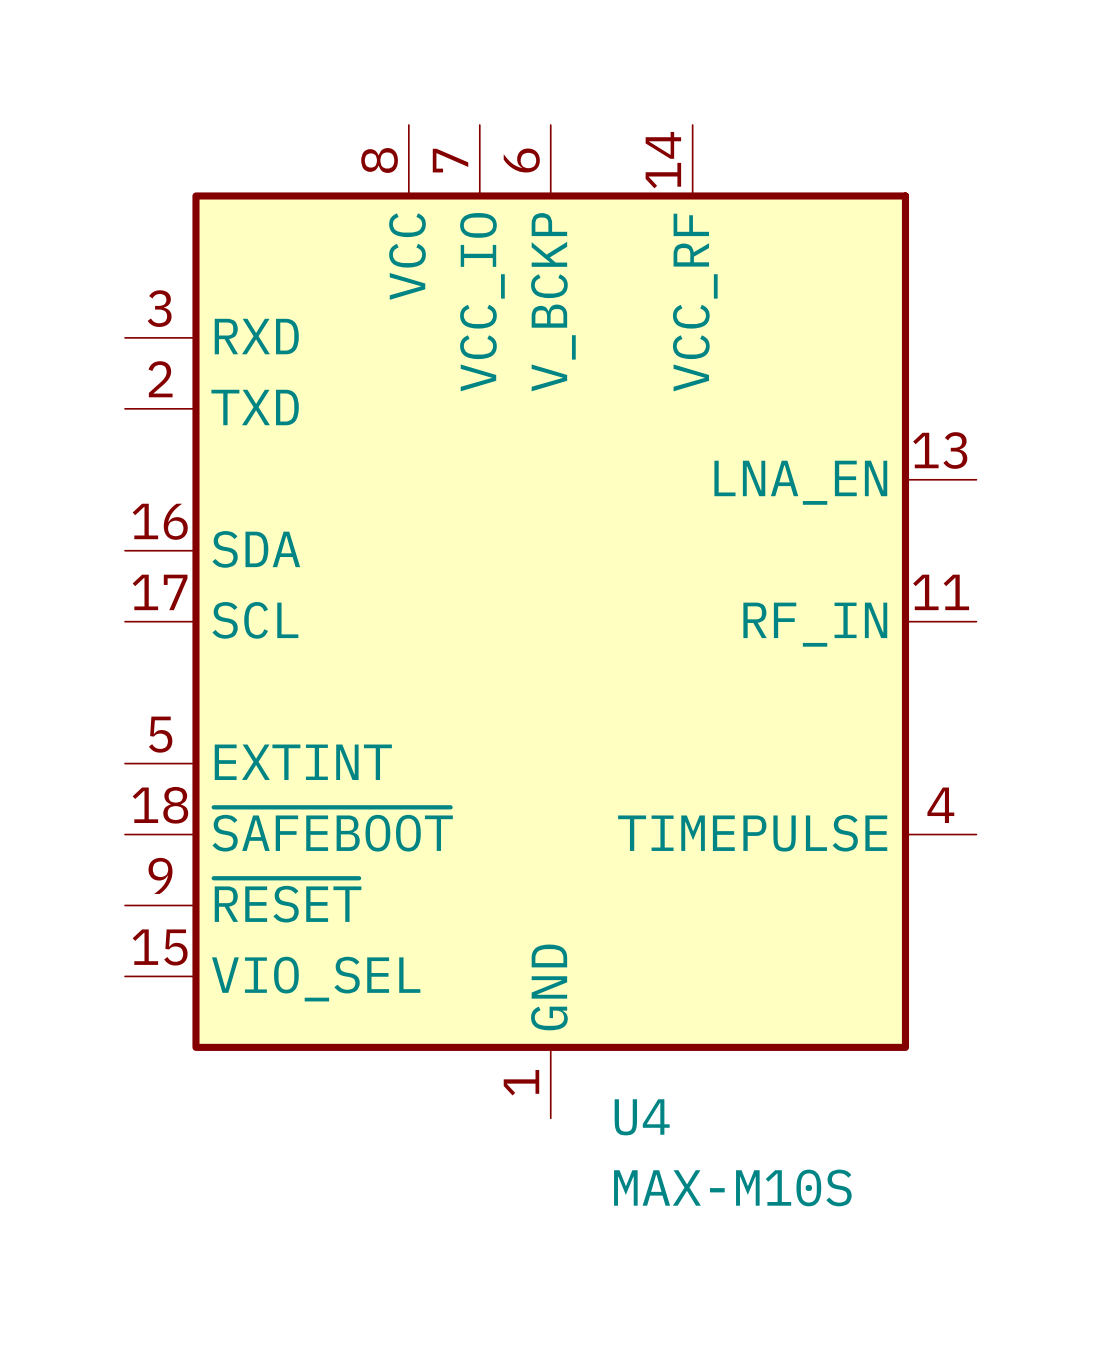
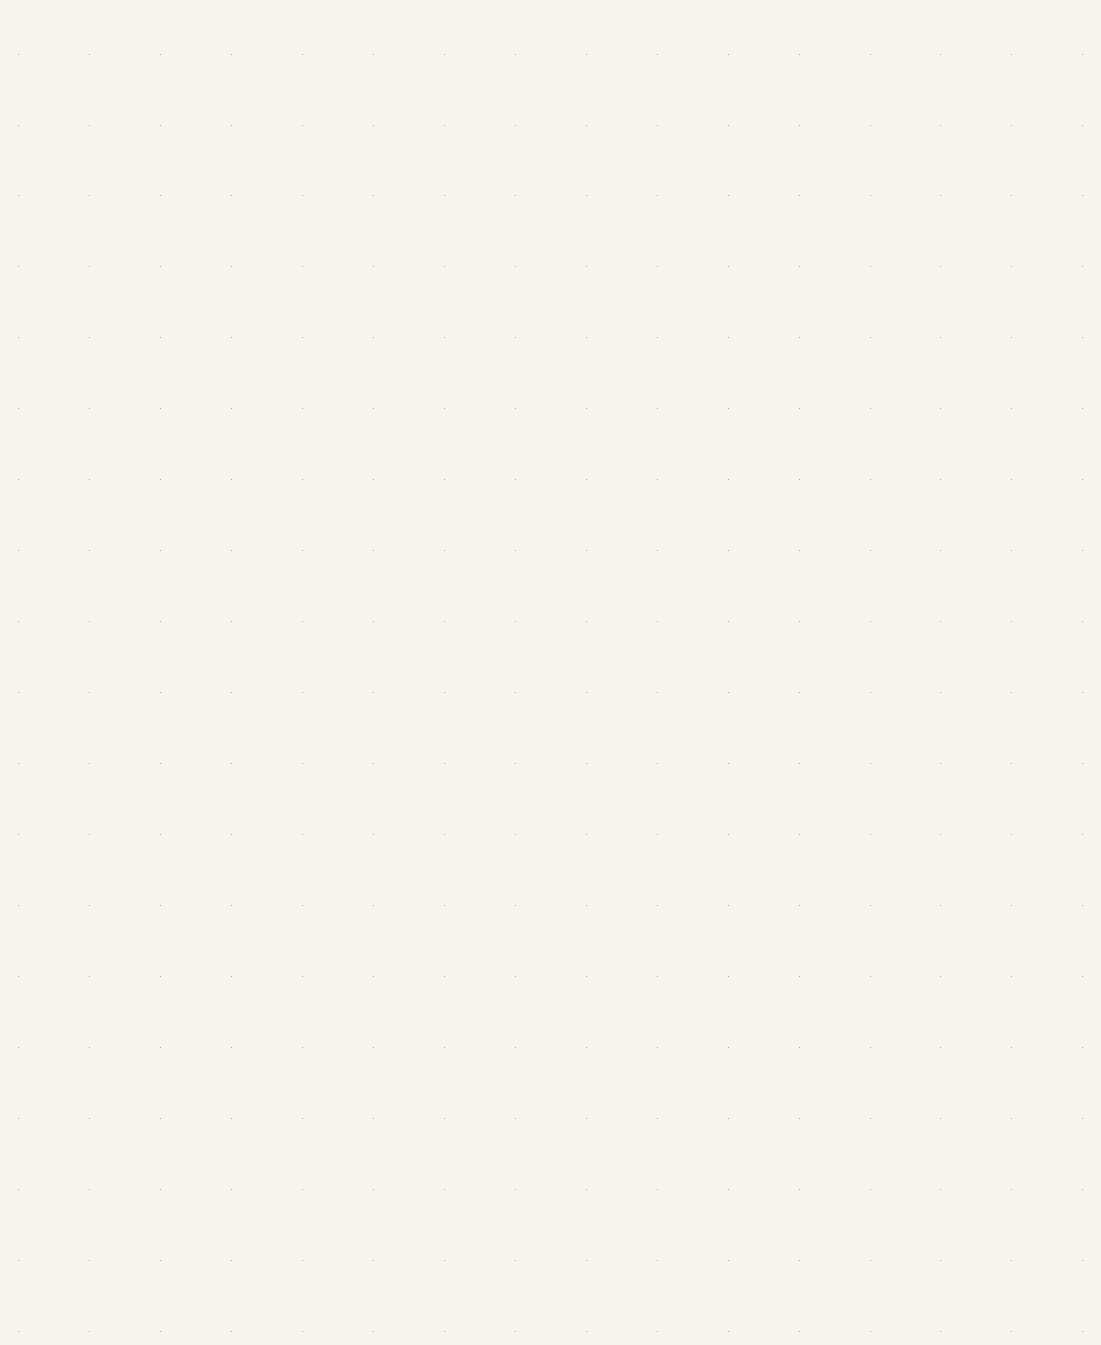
U4: MAX-M10S (550, 621) -> none

